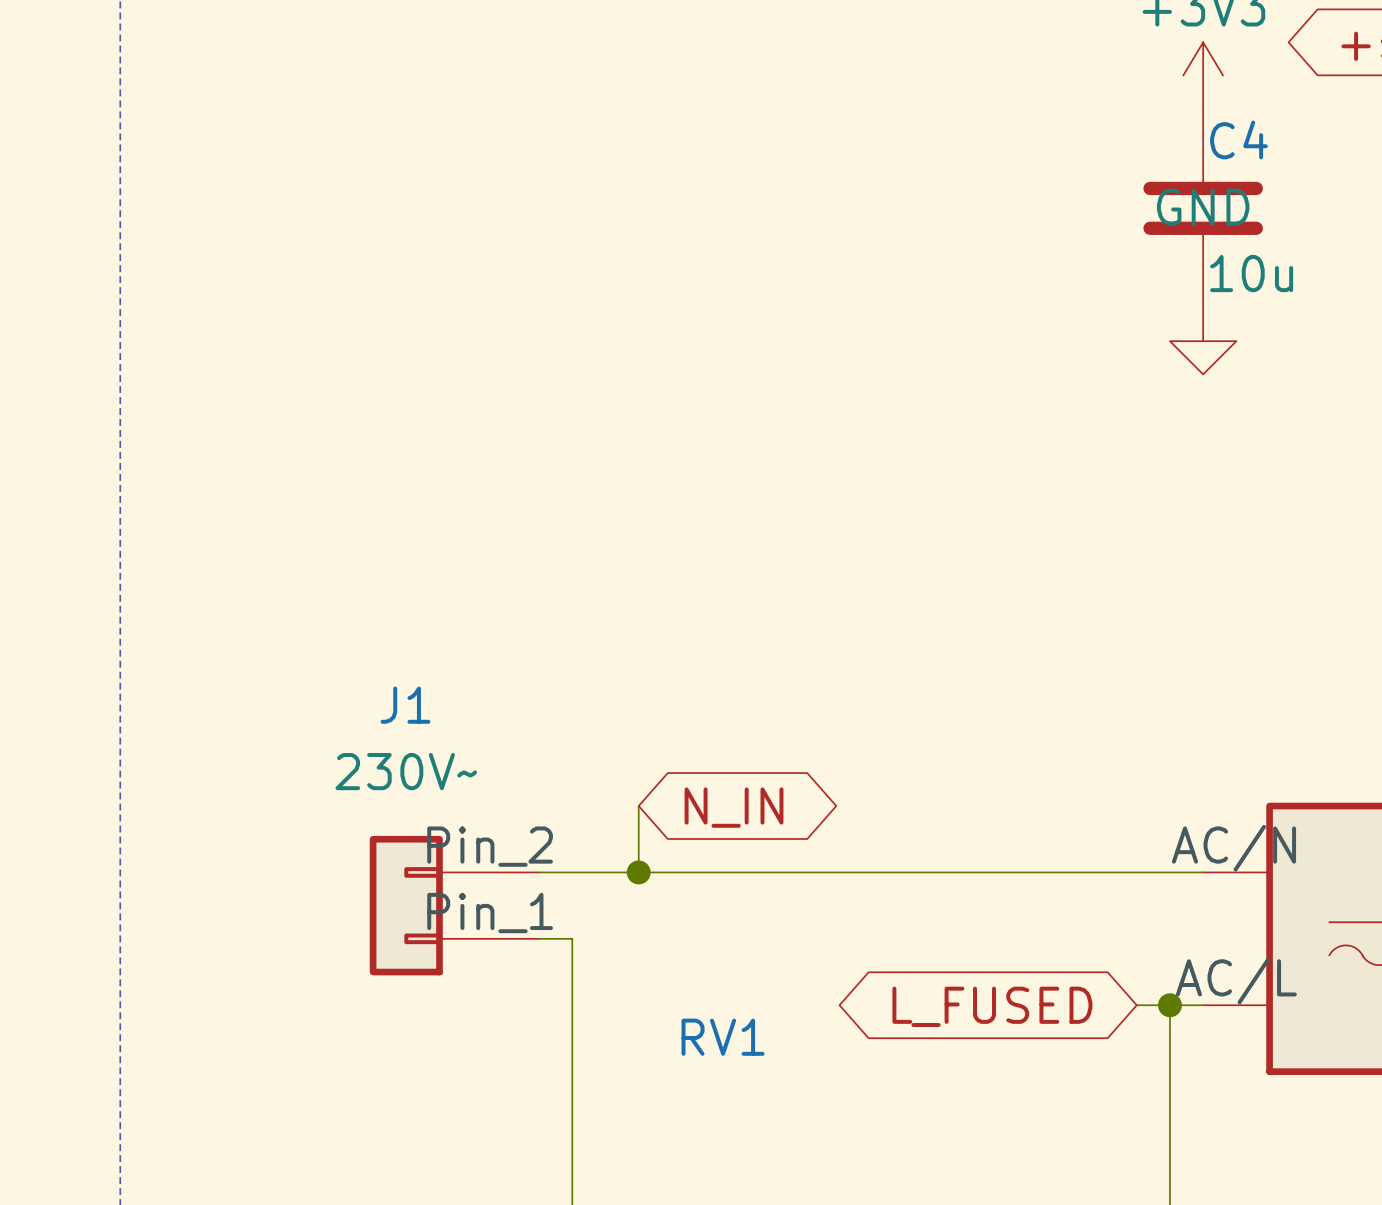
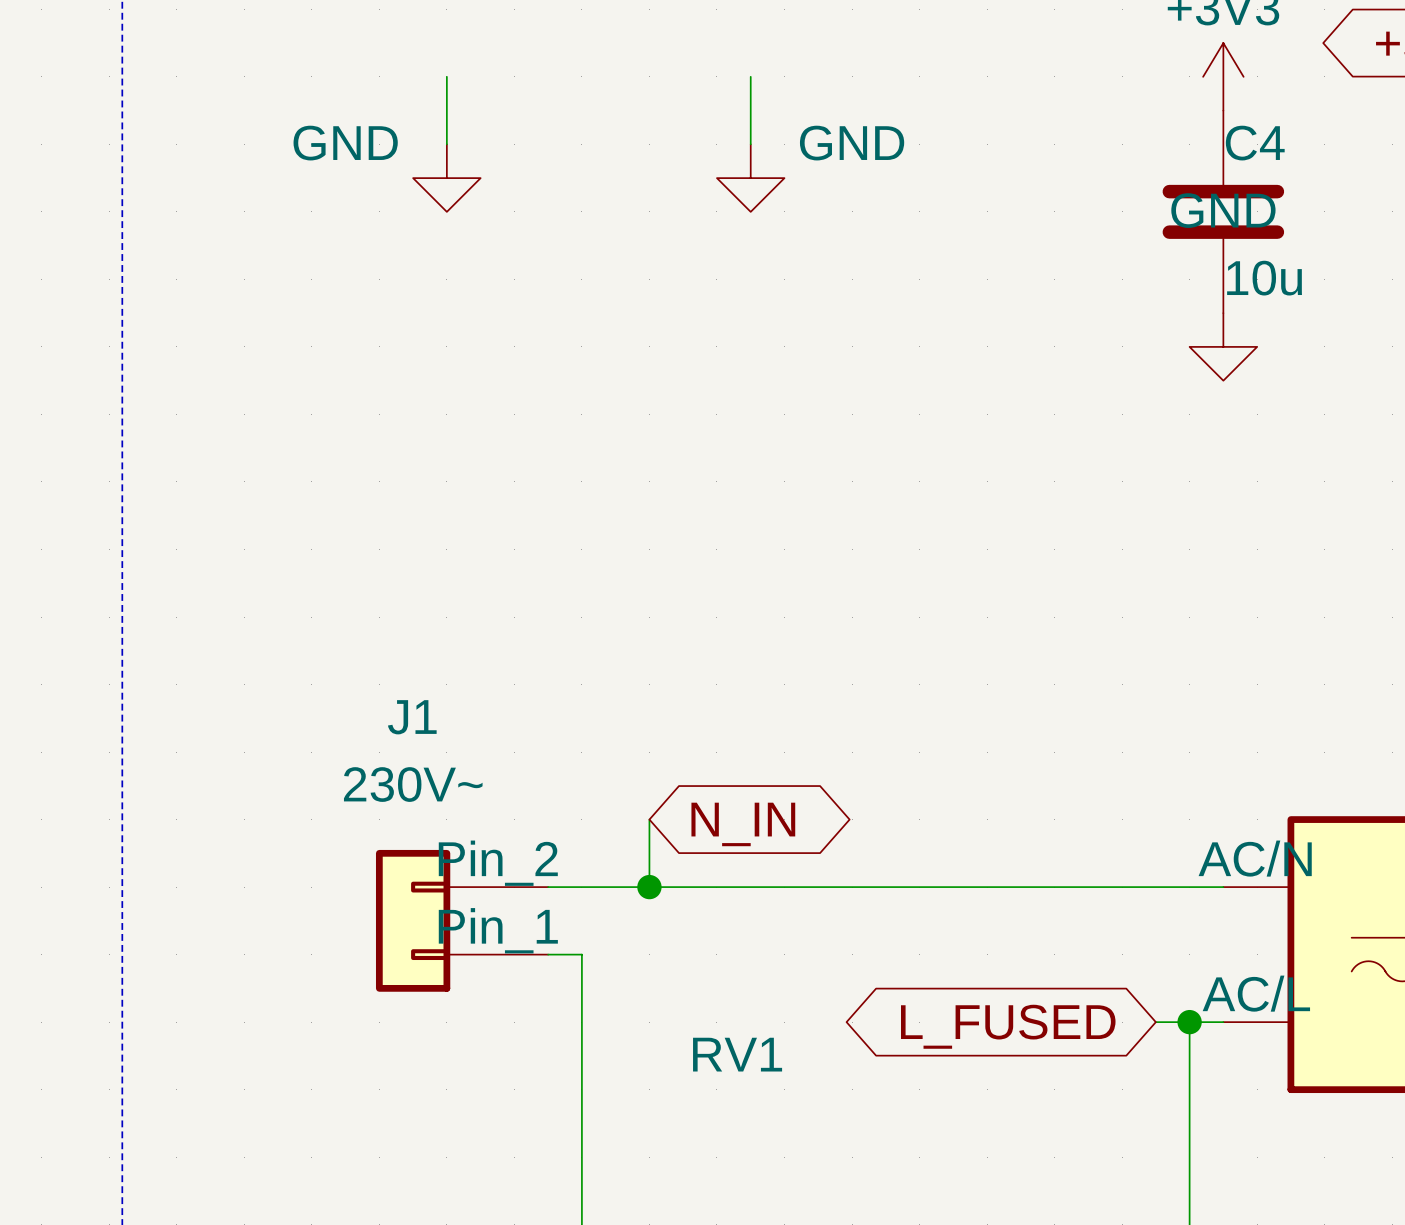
wire: none -> (446, 76) (446, 144)
wire: none -> (750, 76) (750, 144)
power symbol: none -> GND (446, 178)
power symbol: none -> GND (750, 178)

